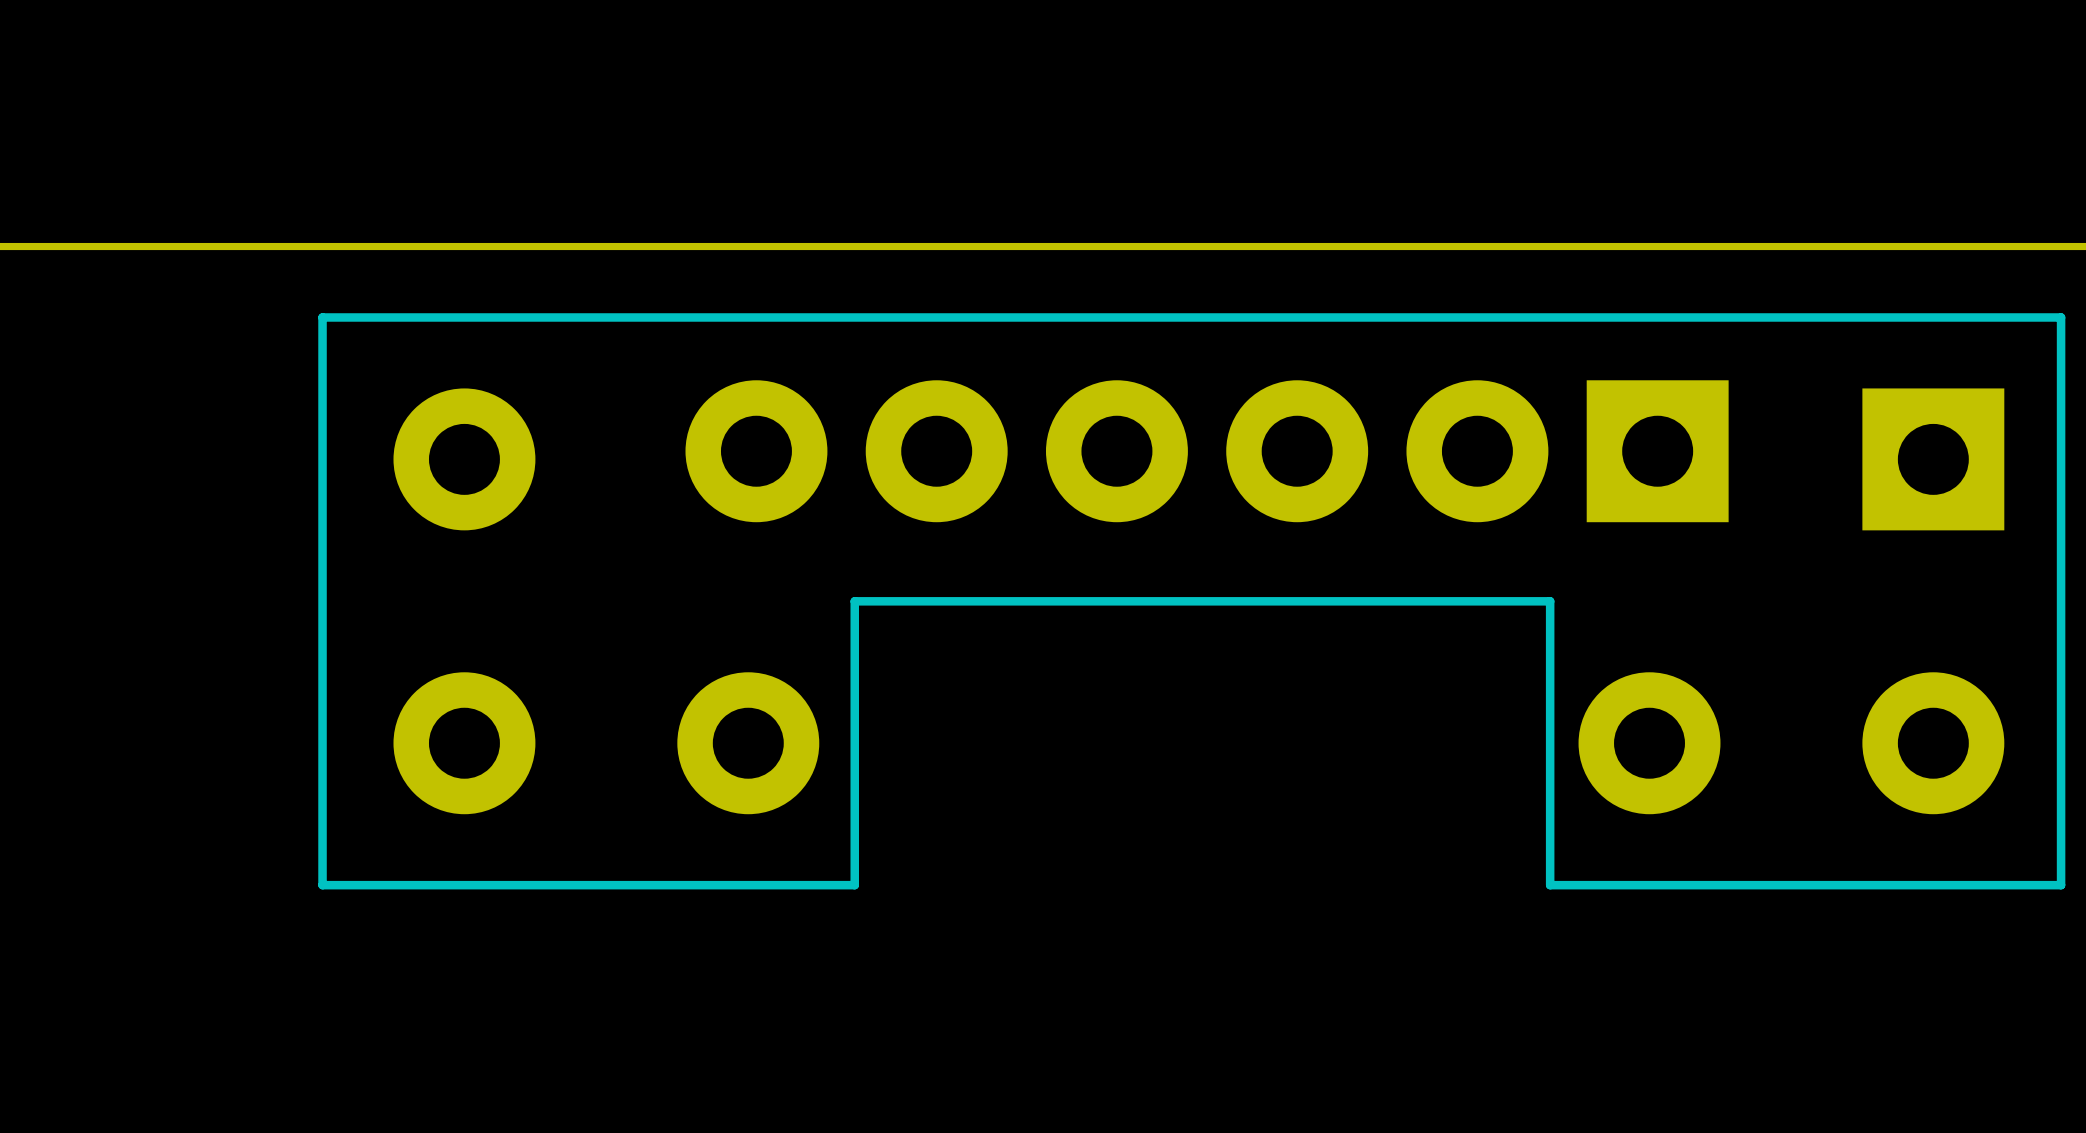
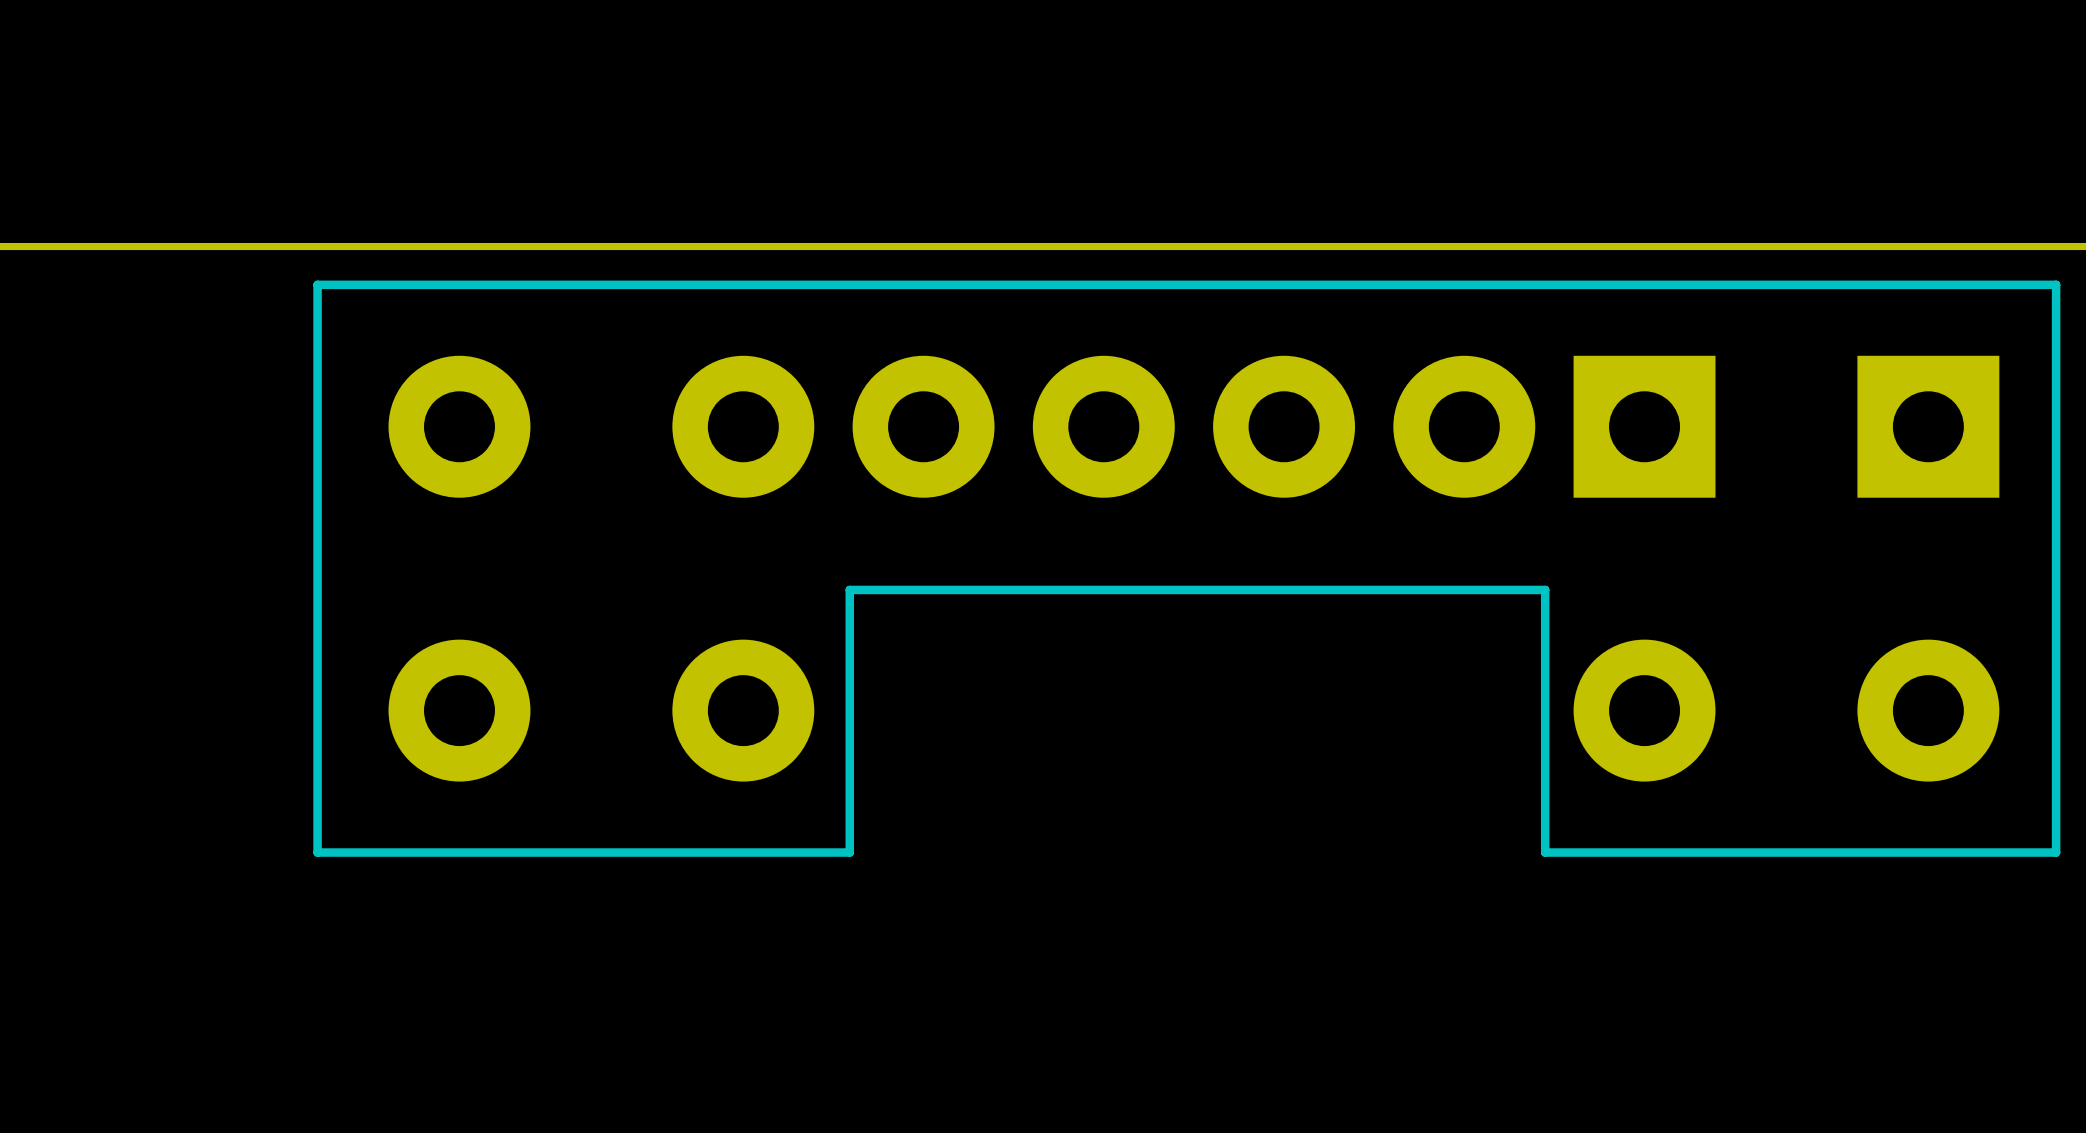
part footprint: [318, 313, 2066, 890] -> [313, 280, 2061, 857]
part: (1207, 451) -> none

